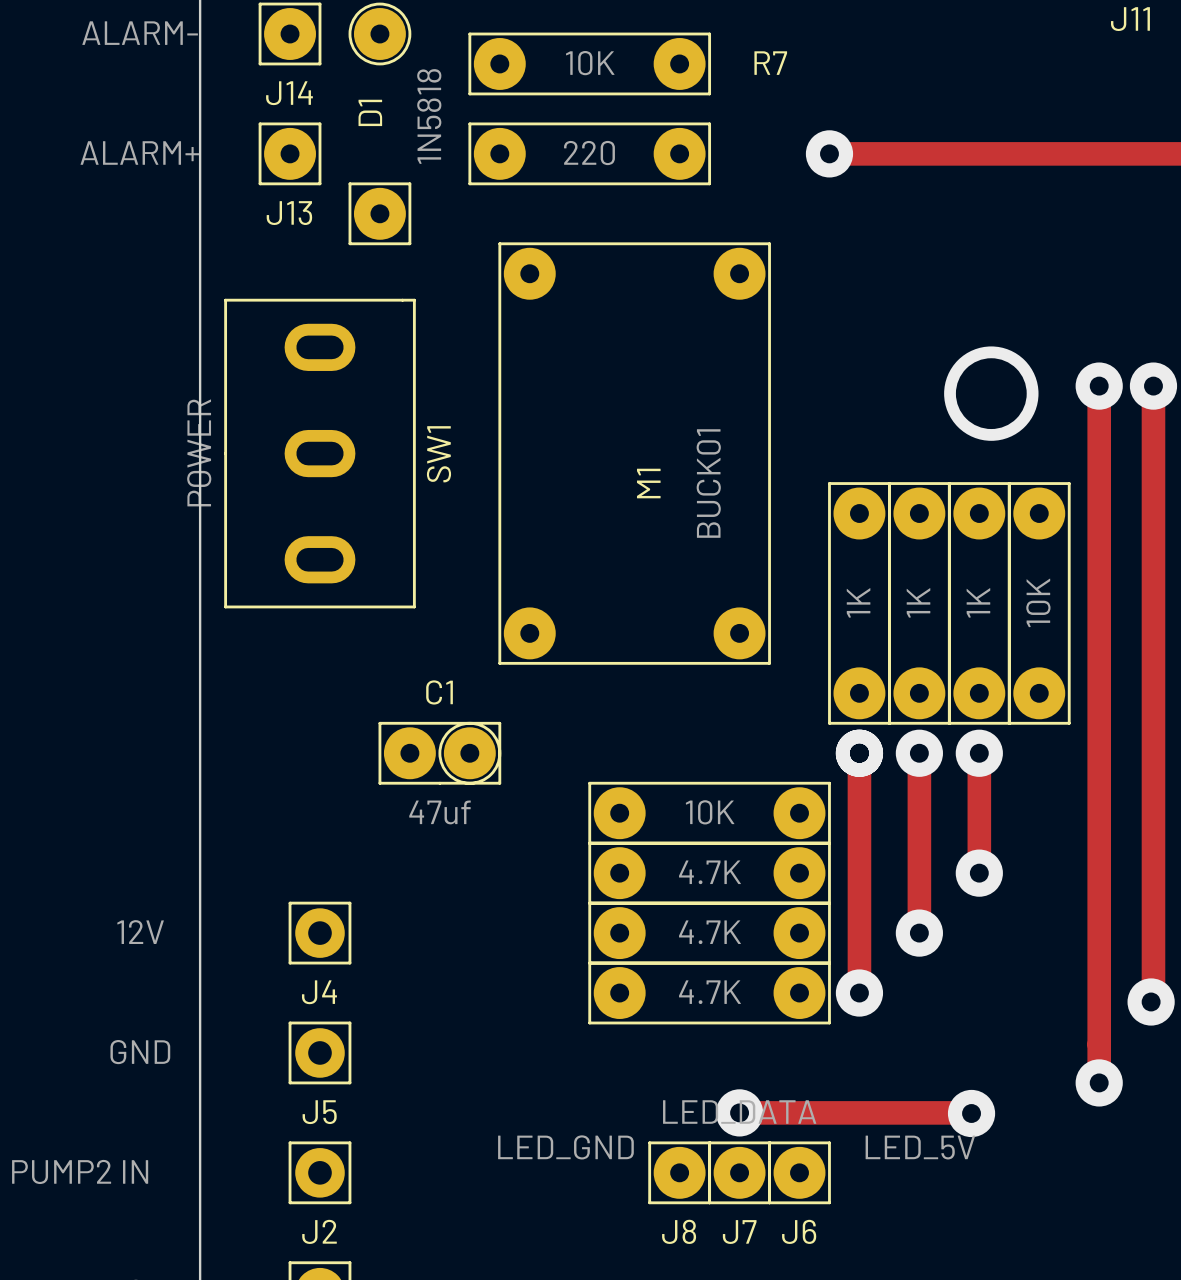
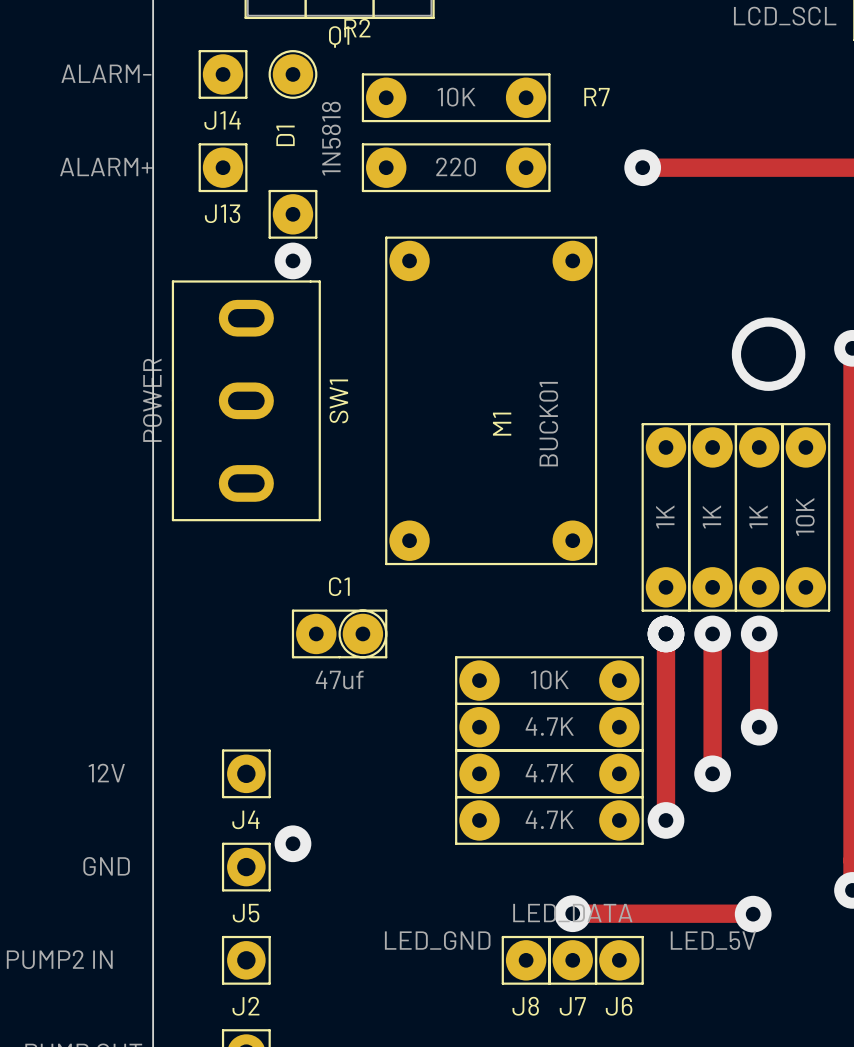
via: none -> (292, 260)
via: none -> (292, 843)

